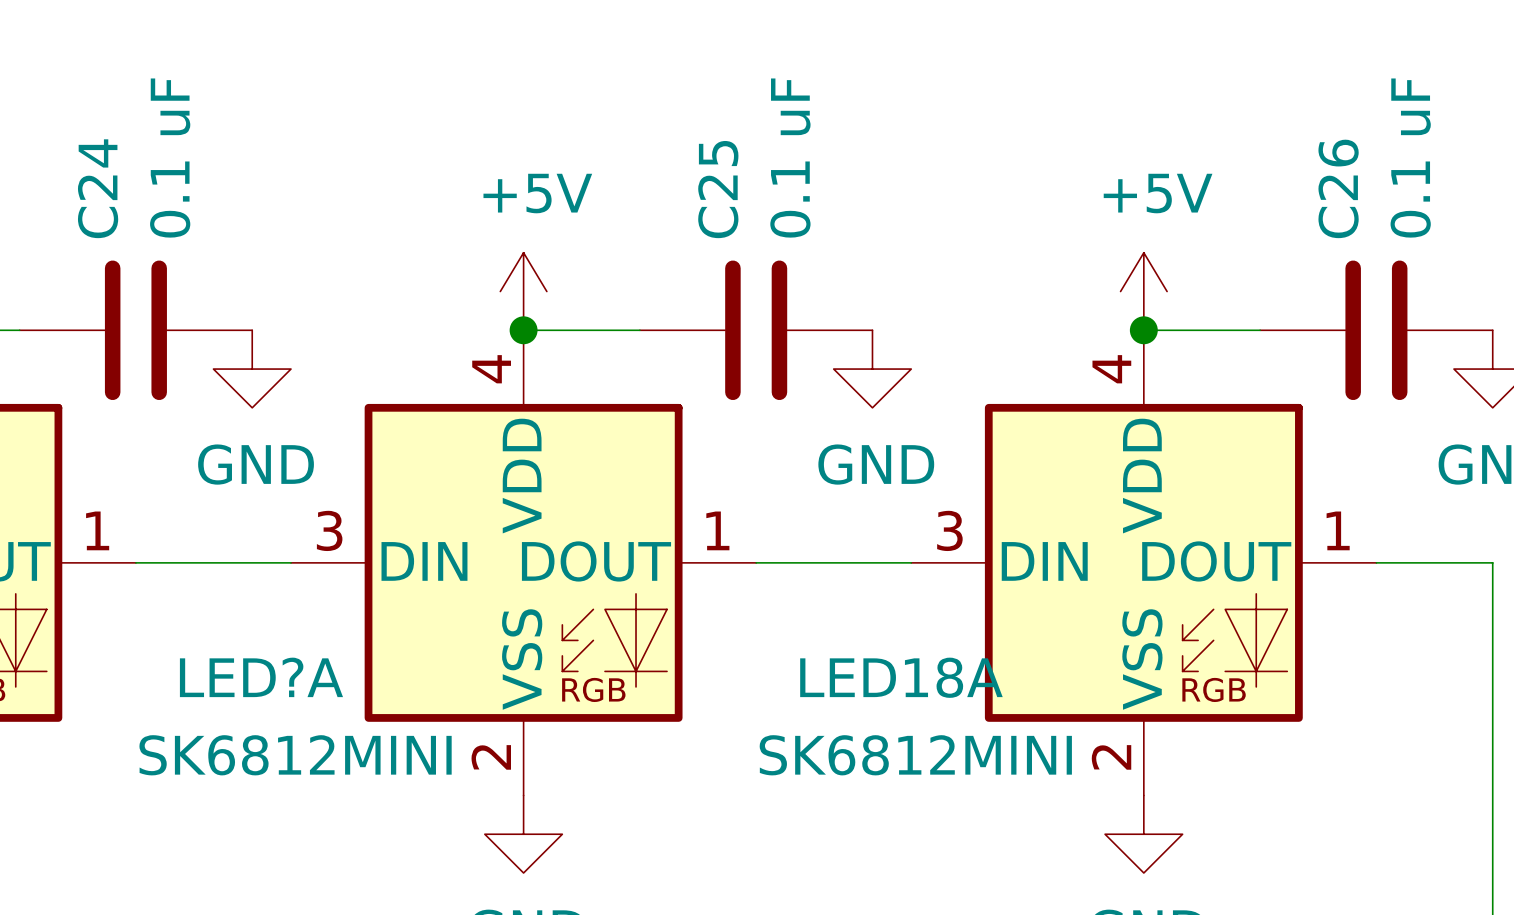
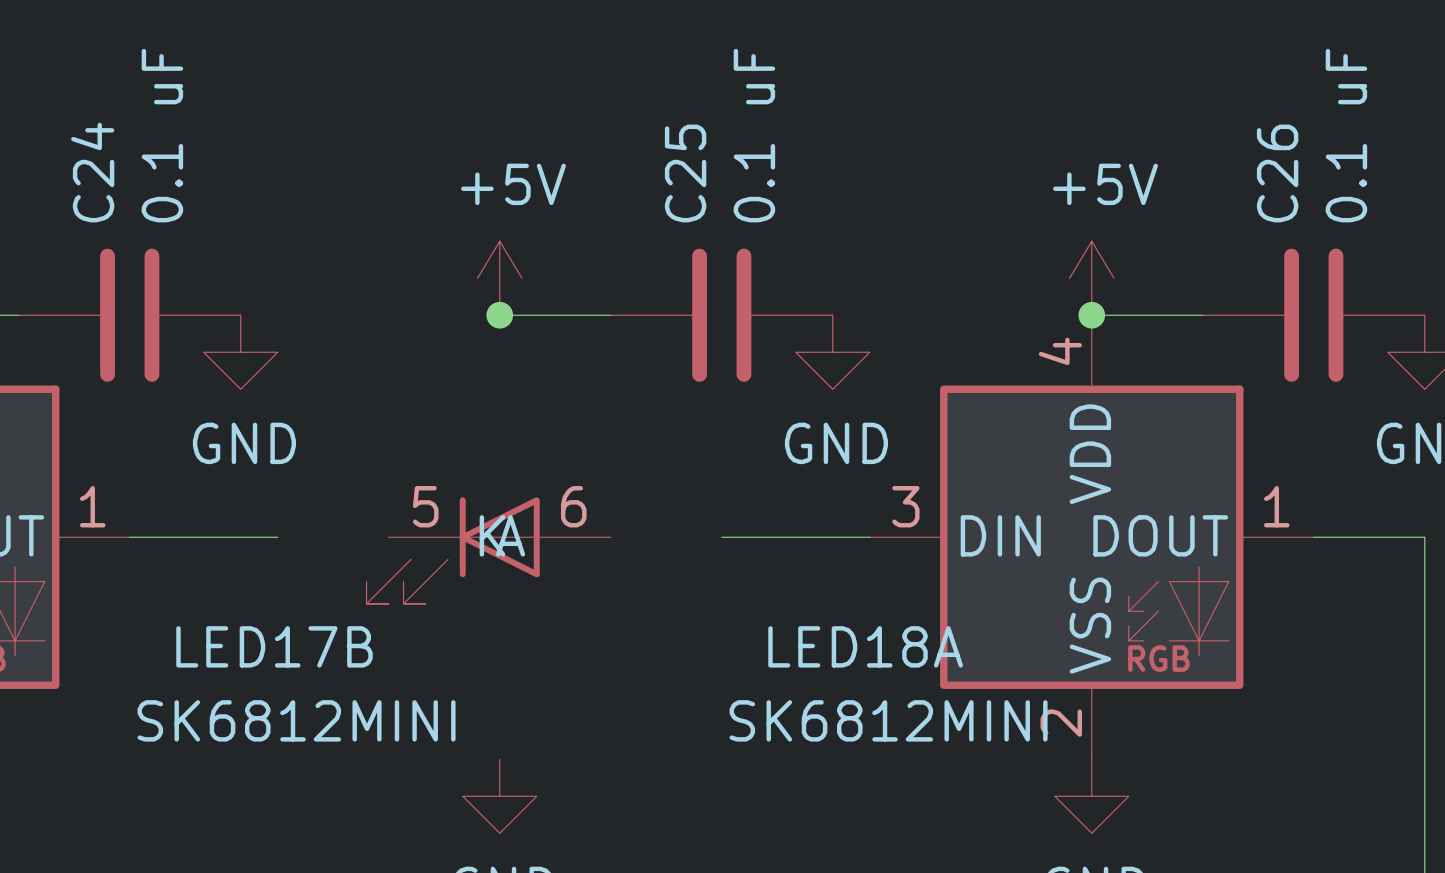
LED?A: SK6812MINI (523, 562) -> none
LED17B: none -> SK6812MINI (488, 550)

